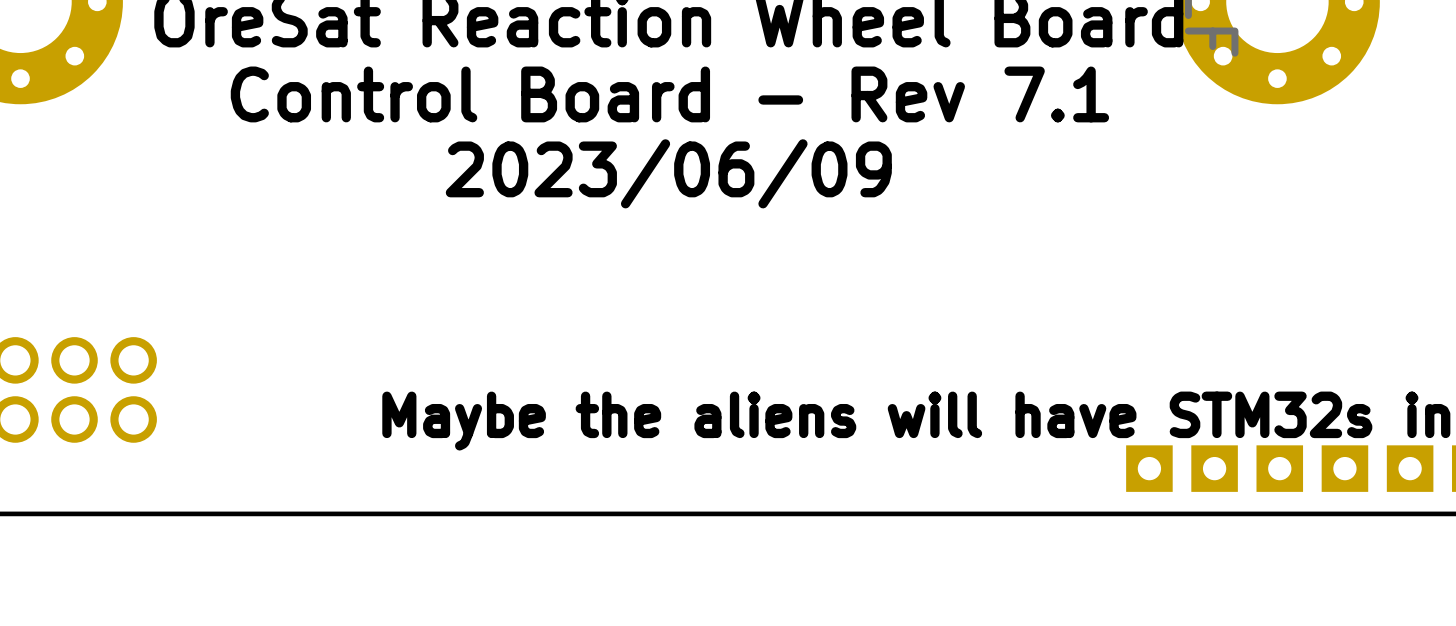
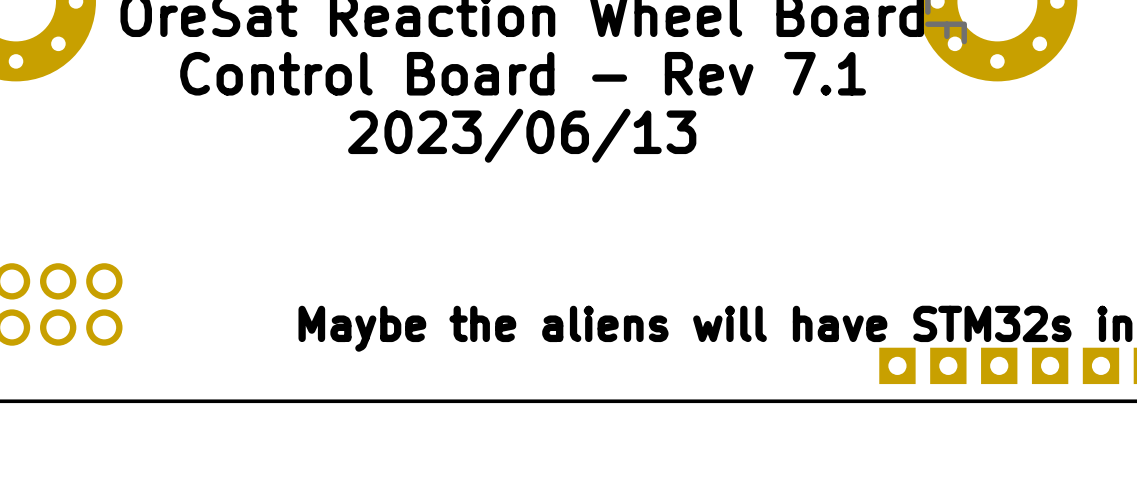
text: 2023/06/09 (668, 173) -> 2023/06/13 (522, 135)

